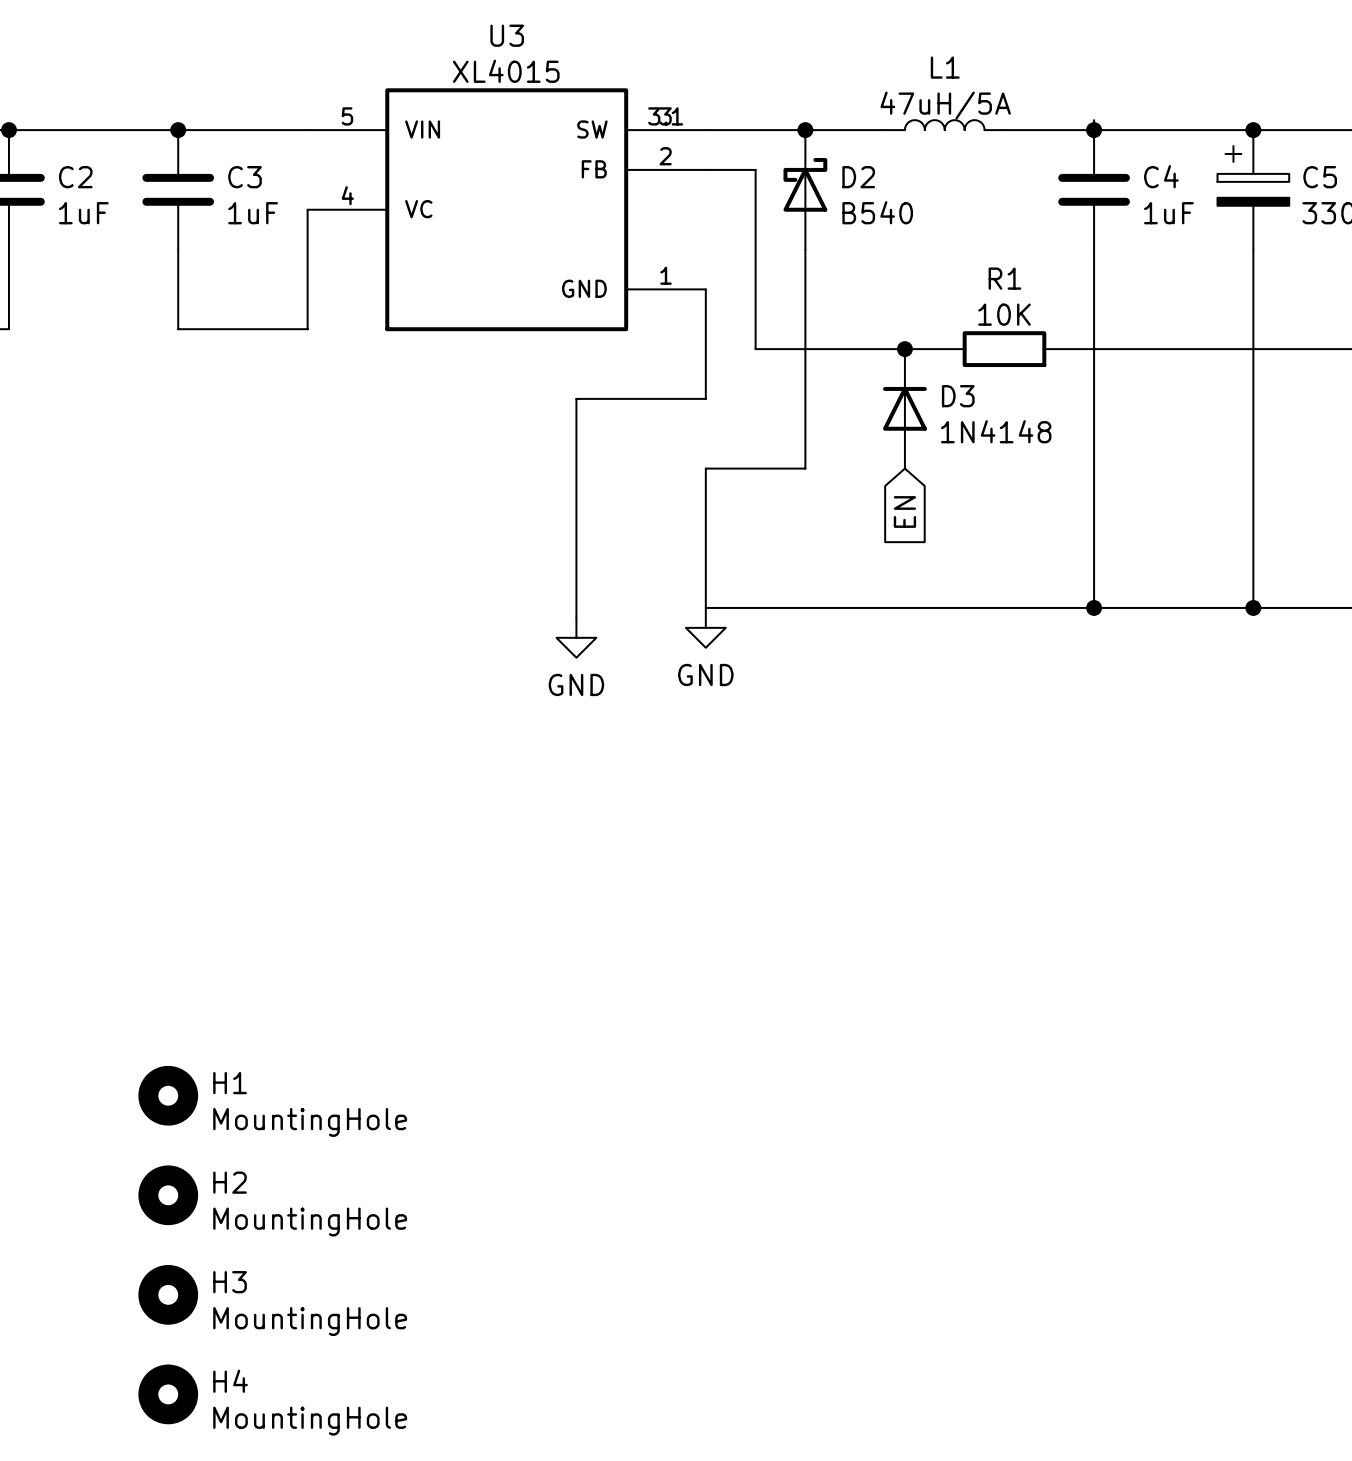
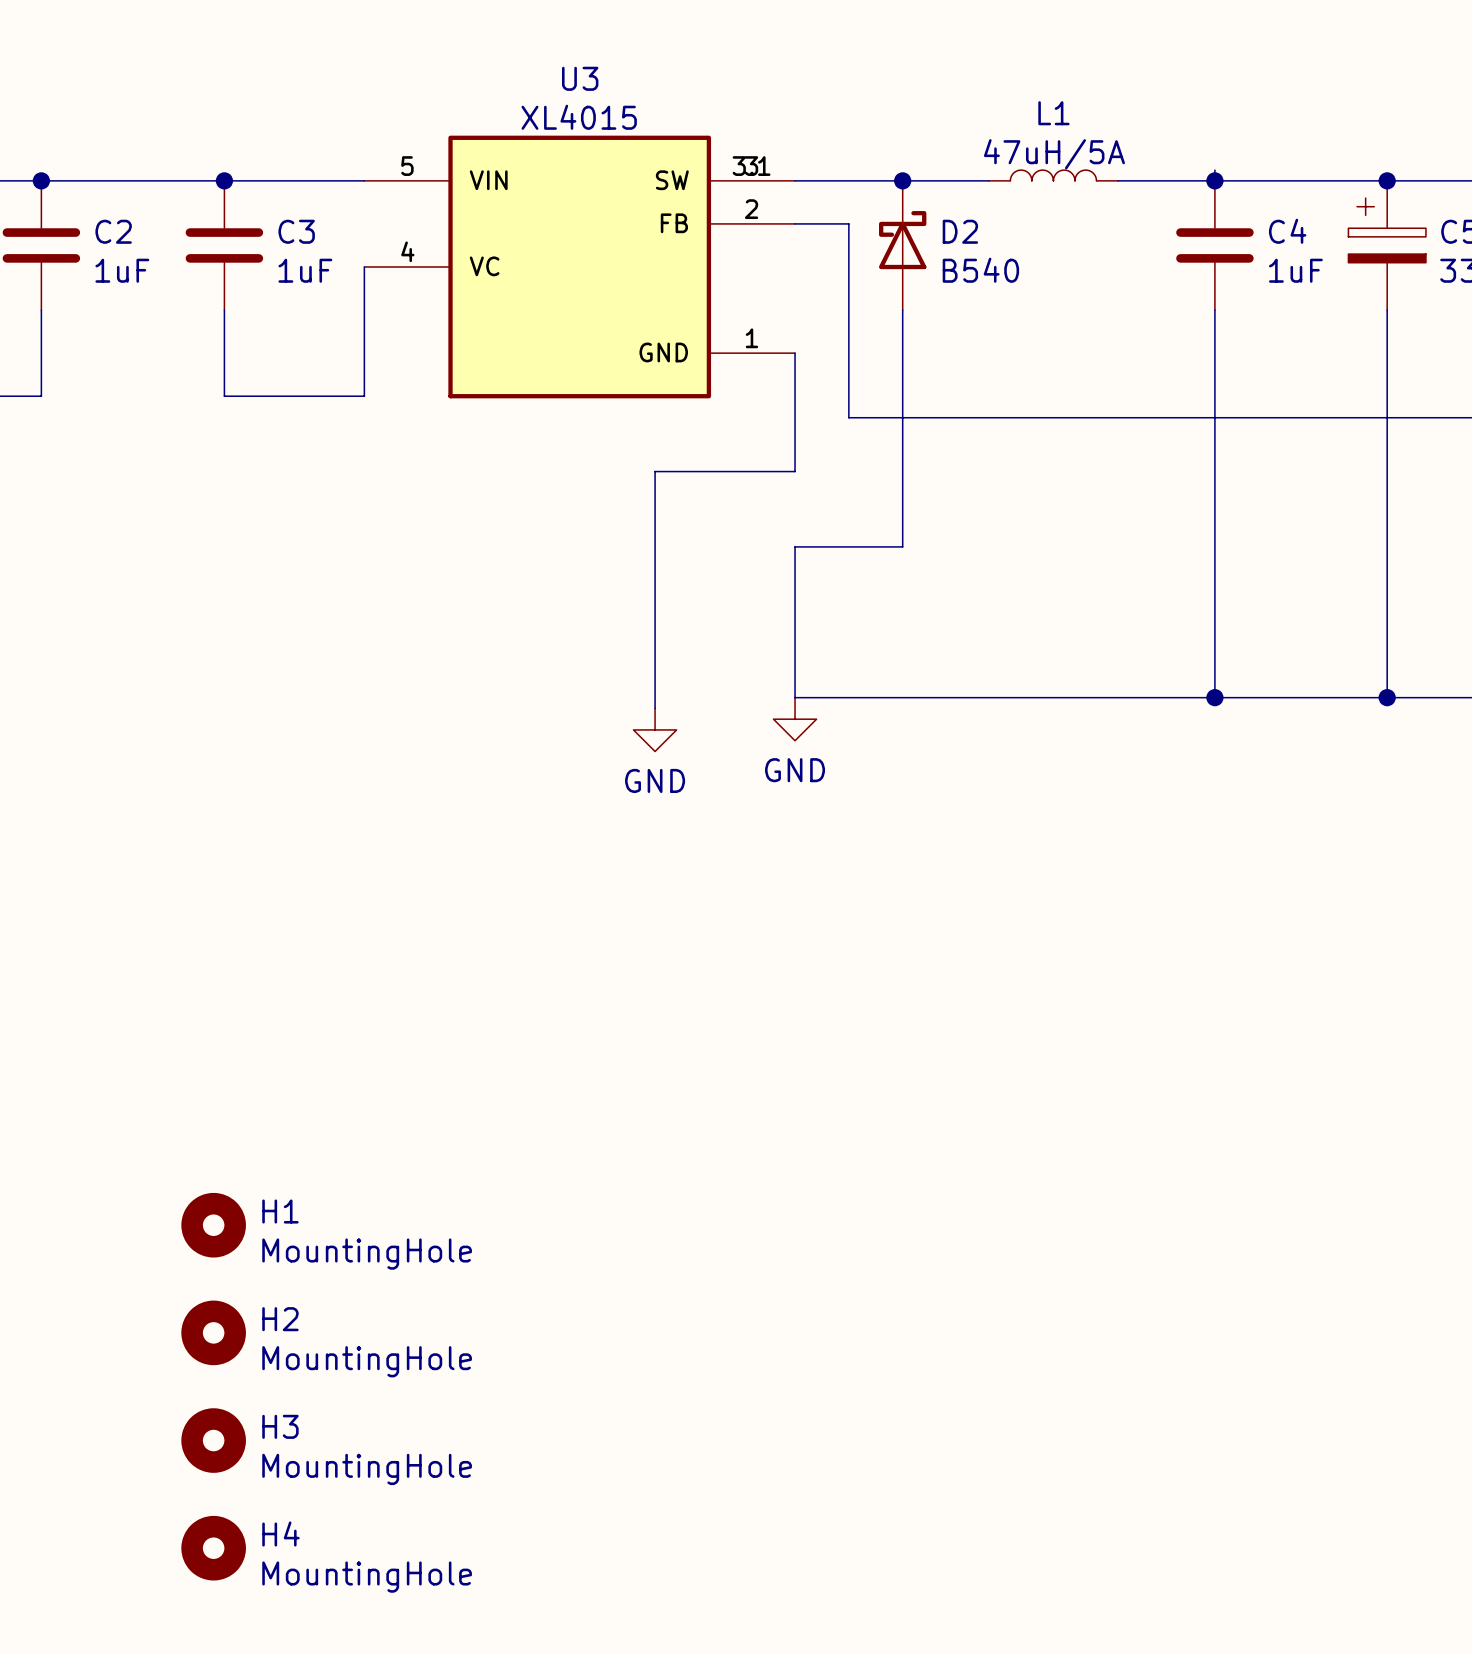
junction: (904, 349) -> none
wire: none -> (1053, 417) (1182, 417)
R1: 10K (1004, 349) -> none
D3: 1N4148 (904, 408) -> none
global label: EN (904, 511) -> none

